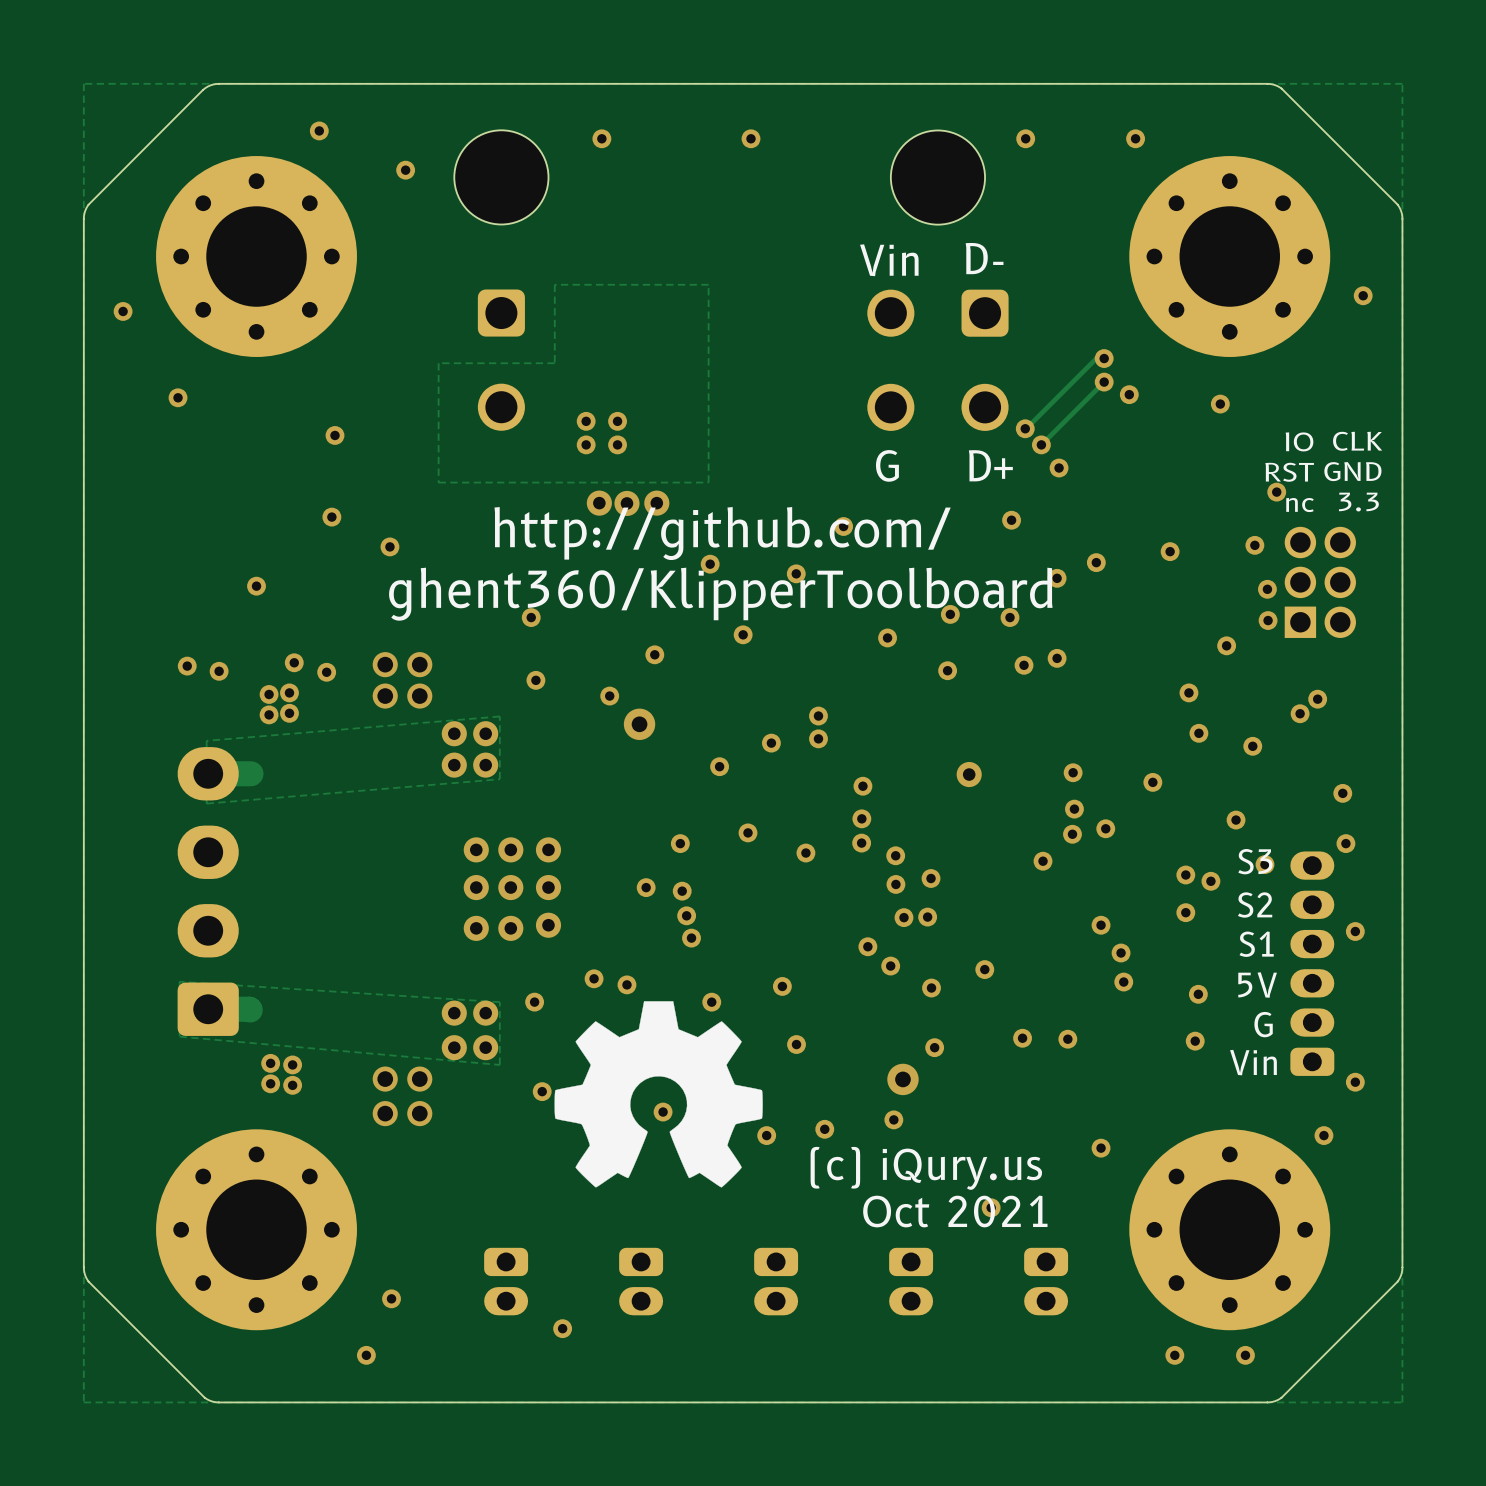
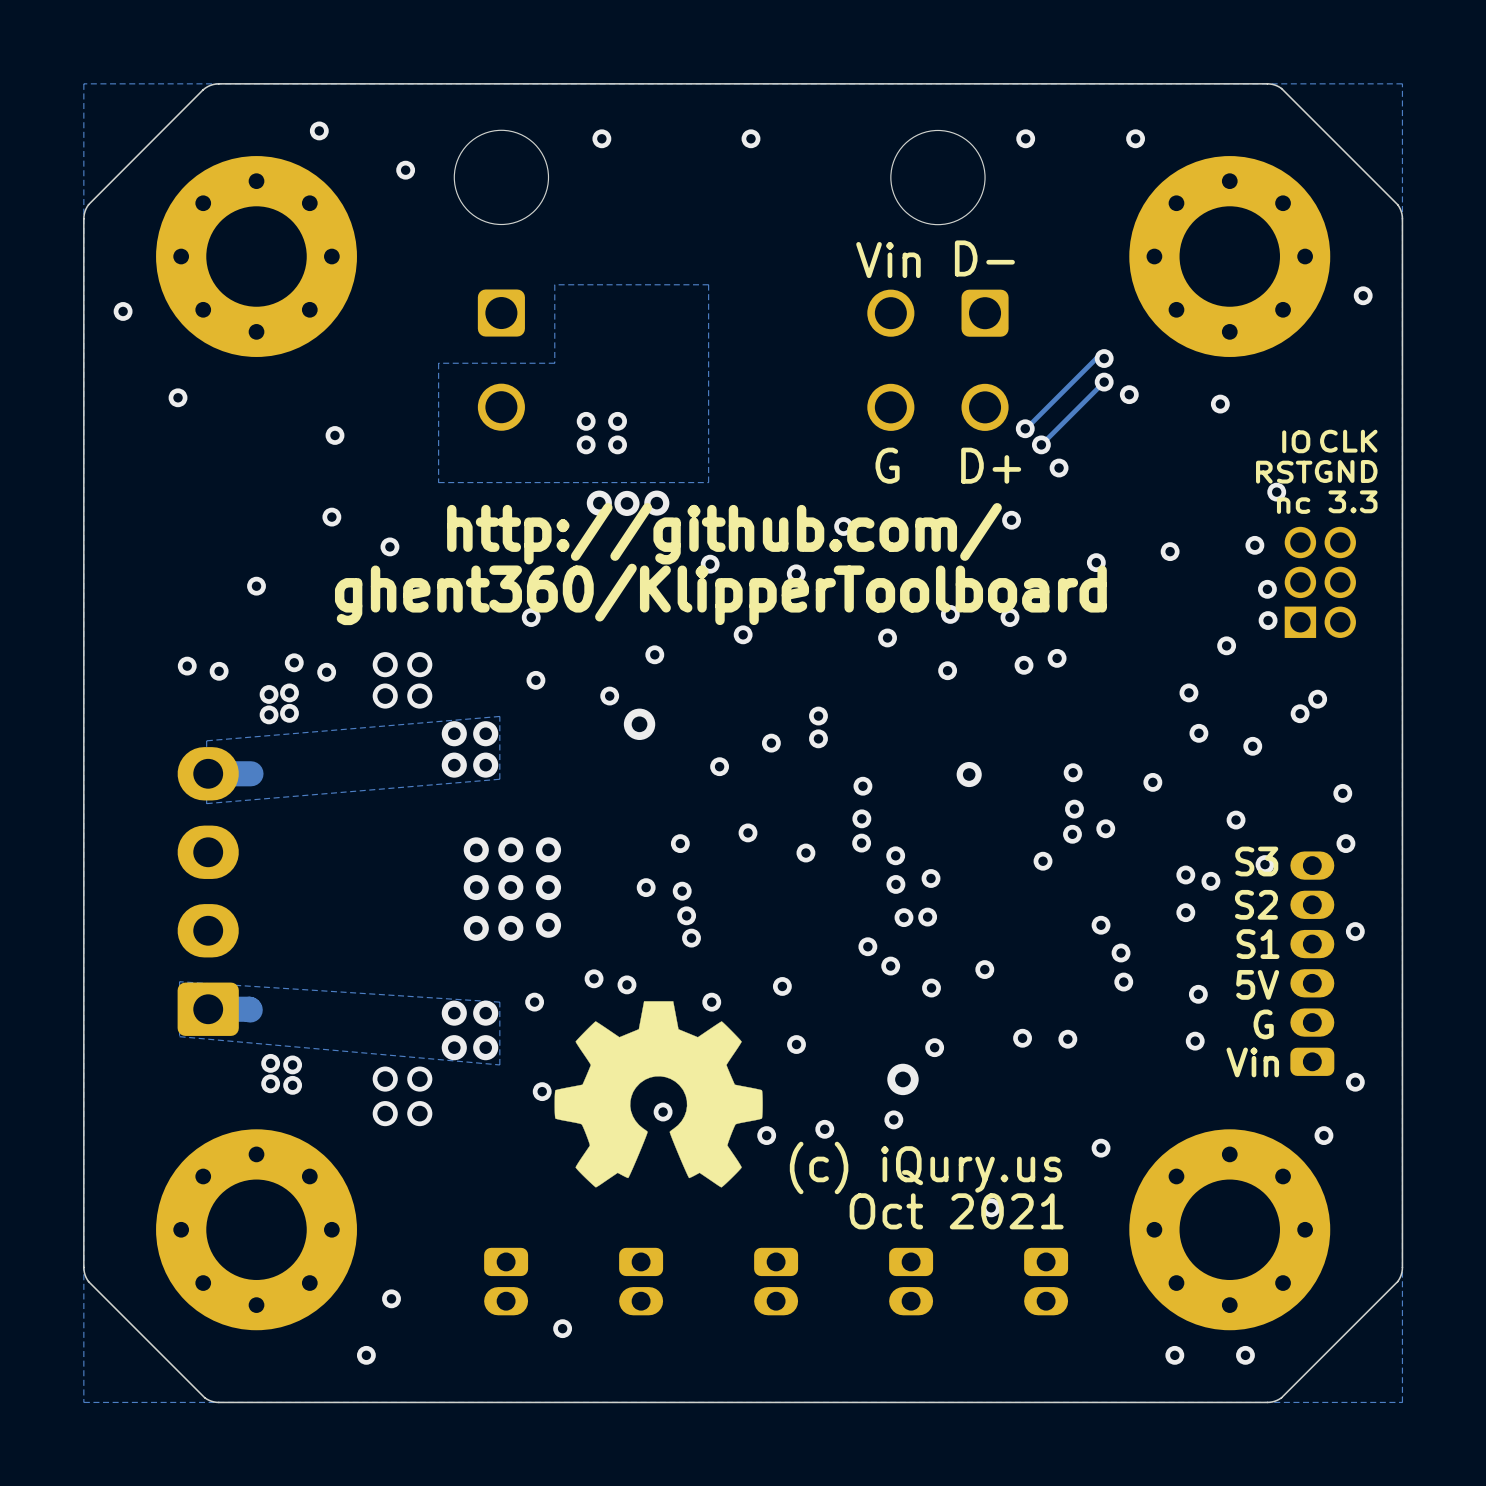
via: (1057, 578) -> none

